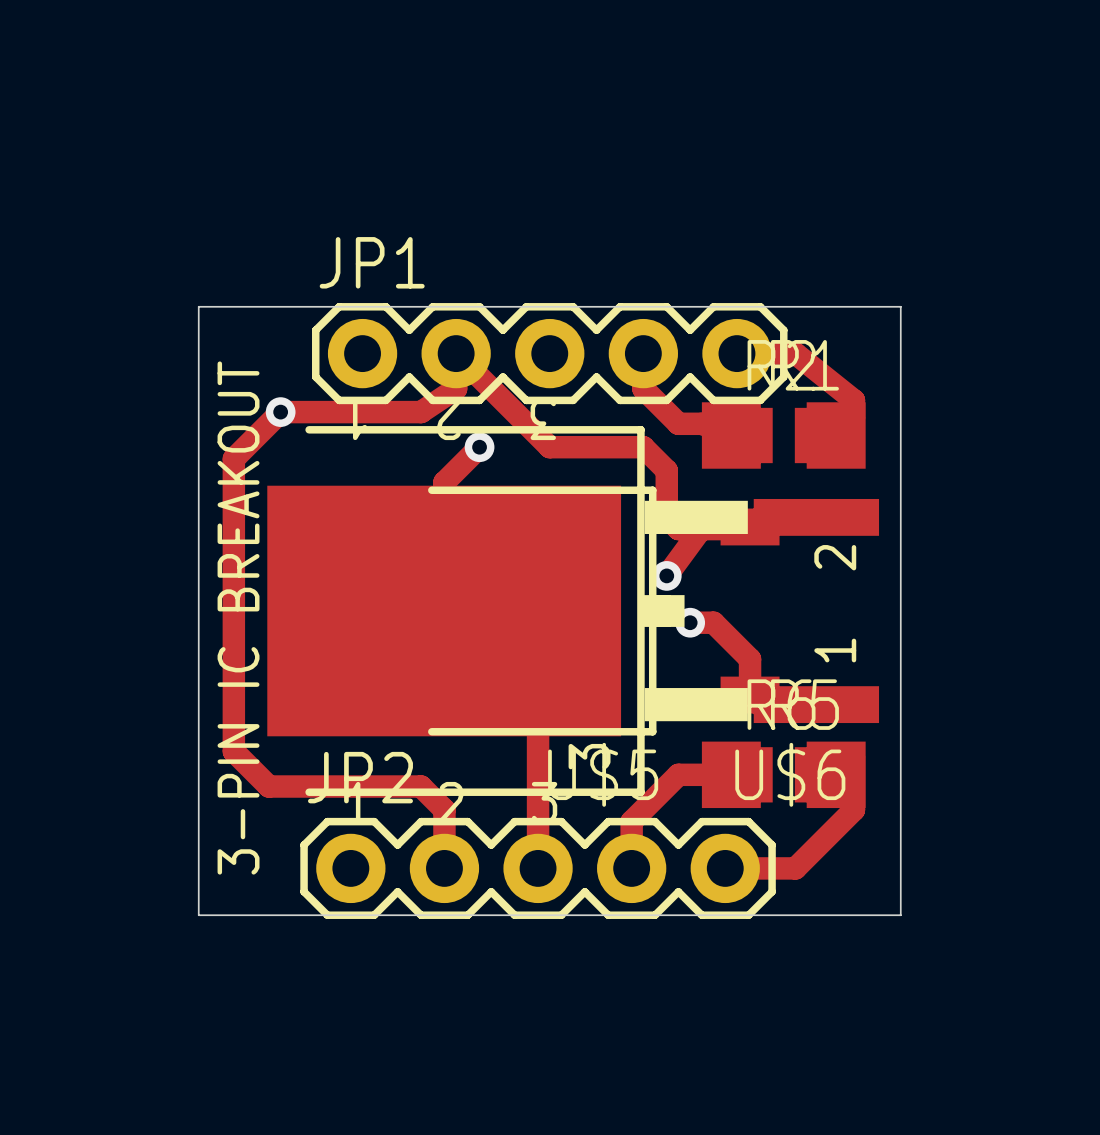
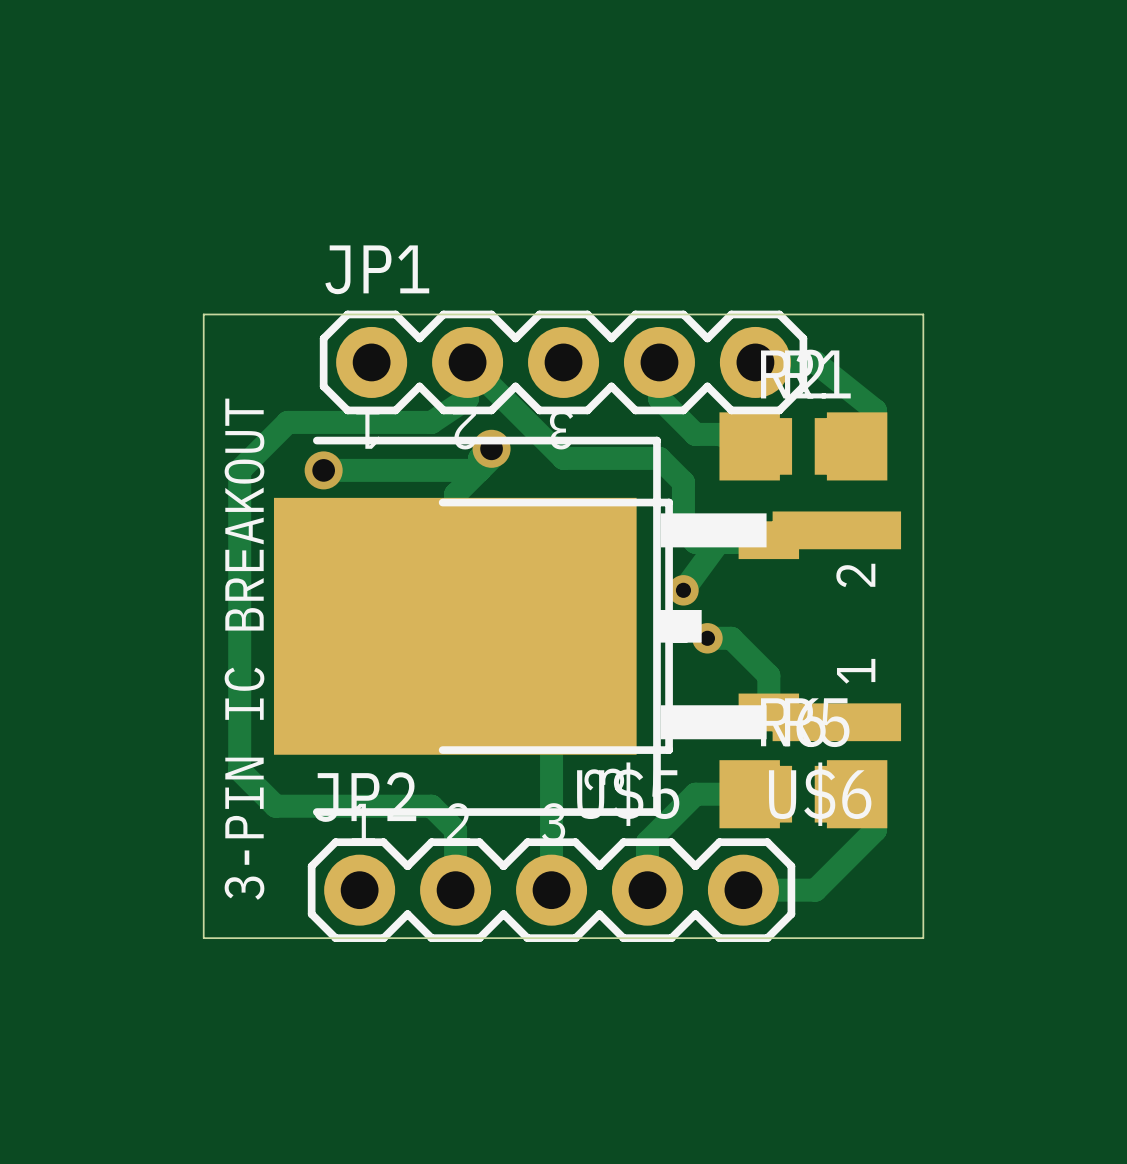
via: (280, 412) -> none
via size: [464, 432, 495, 463] -> [472, 429, 511, 468]
track: none -> (491, 458) (491, 448) (479, 458) (479, 470) (323, 470)
via: none -> (323, 470)

